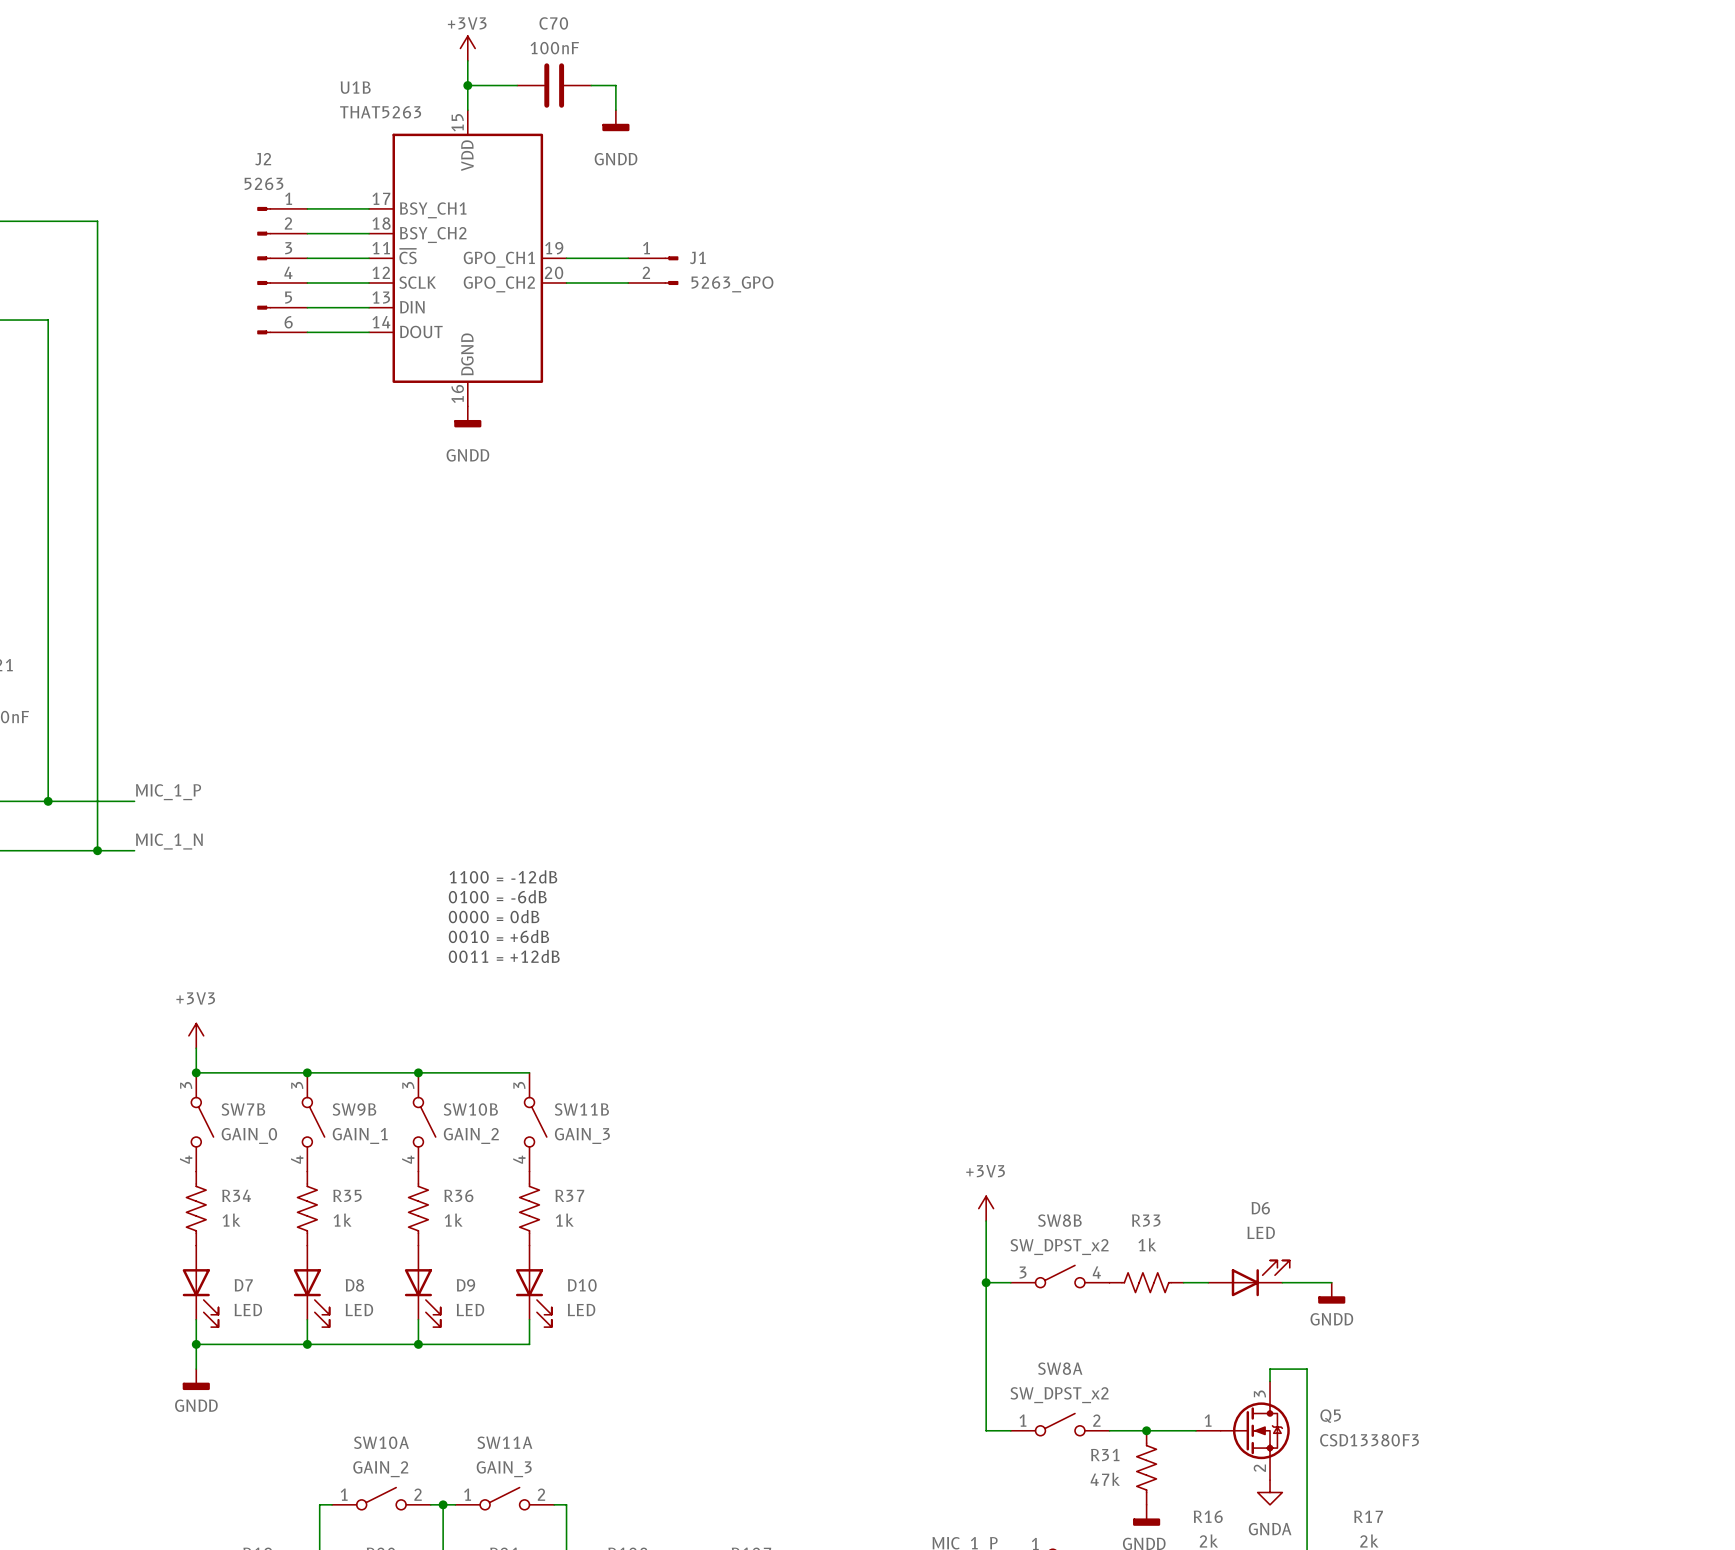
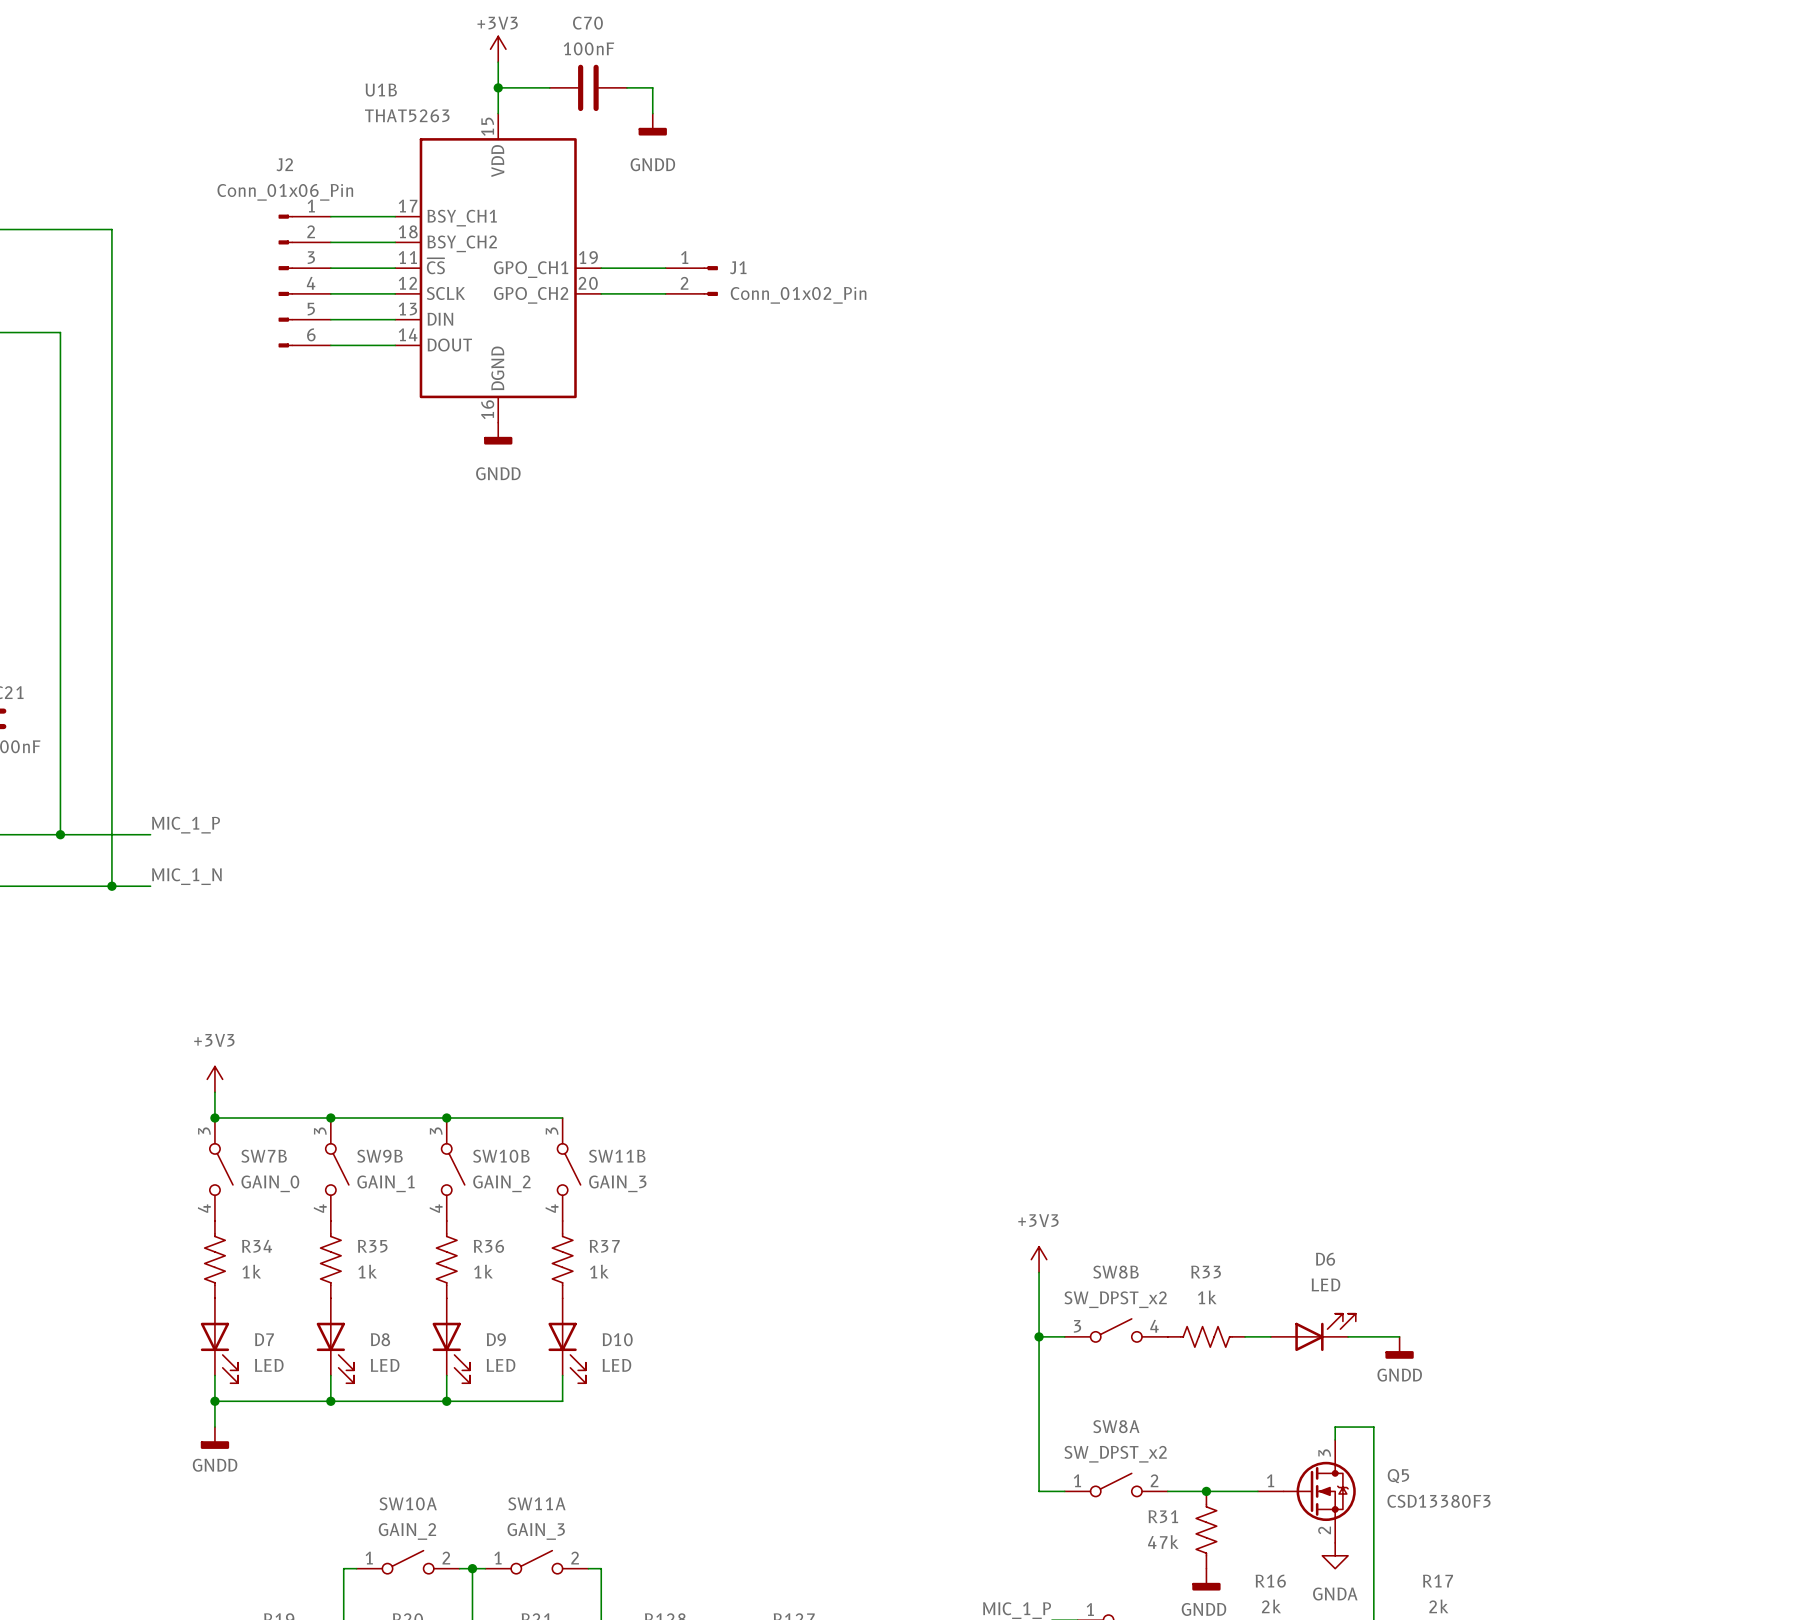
J2 value: 5263 (263, 183) -> Conn_01x06_Pin (285, 192)
J1 value: 5263_GPO (732, 284) -> Conn_01x02_Pin (798, 295)
text: 1100 = -12dB (503, 876) -> none
text: 0100 = -6dB (497, 896) -> none
text: 0000 = 0dB (494, 916) -> none
text: 0010 = +6dB (498, 936) -> none
text: 0011 = +12dB (504, 956) -> none

